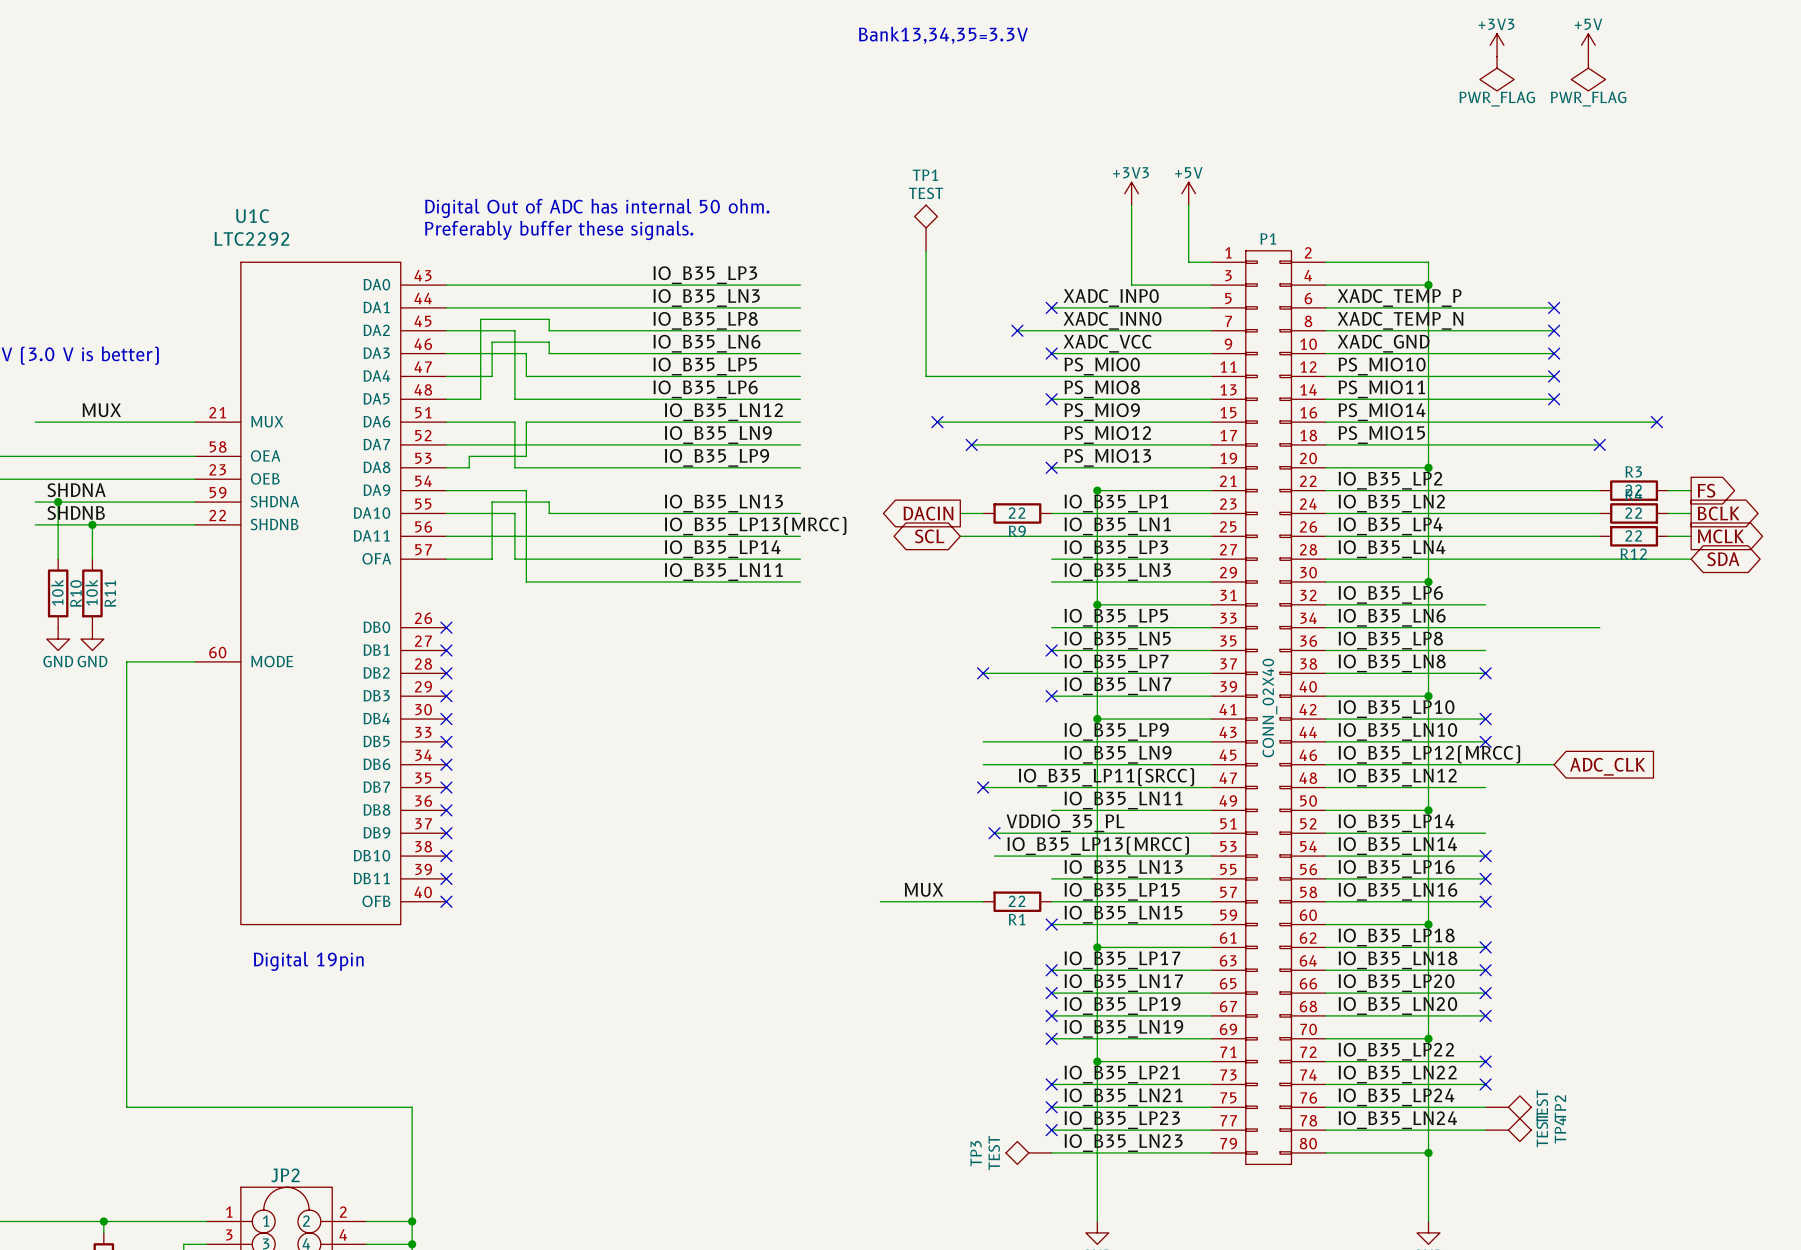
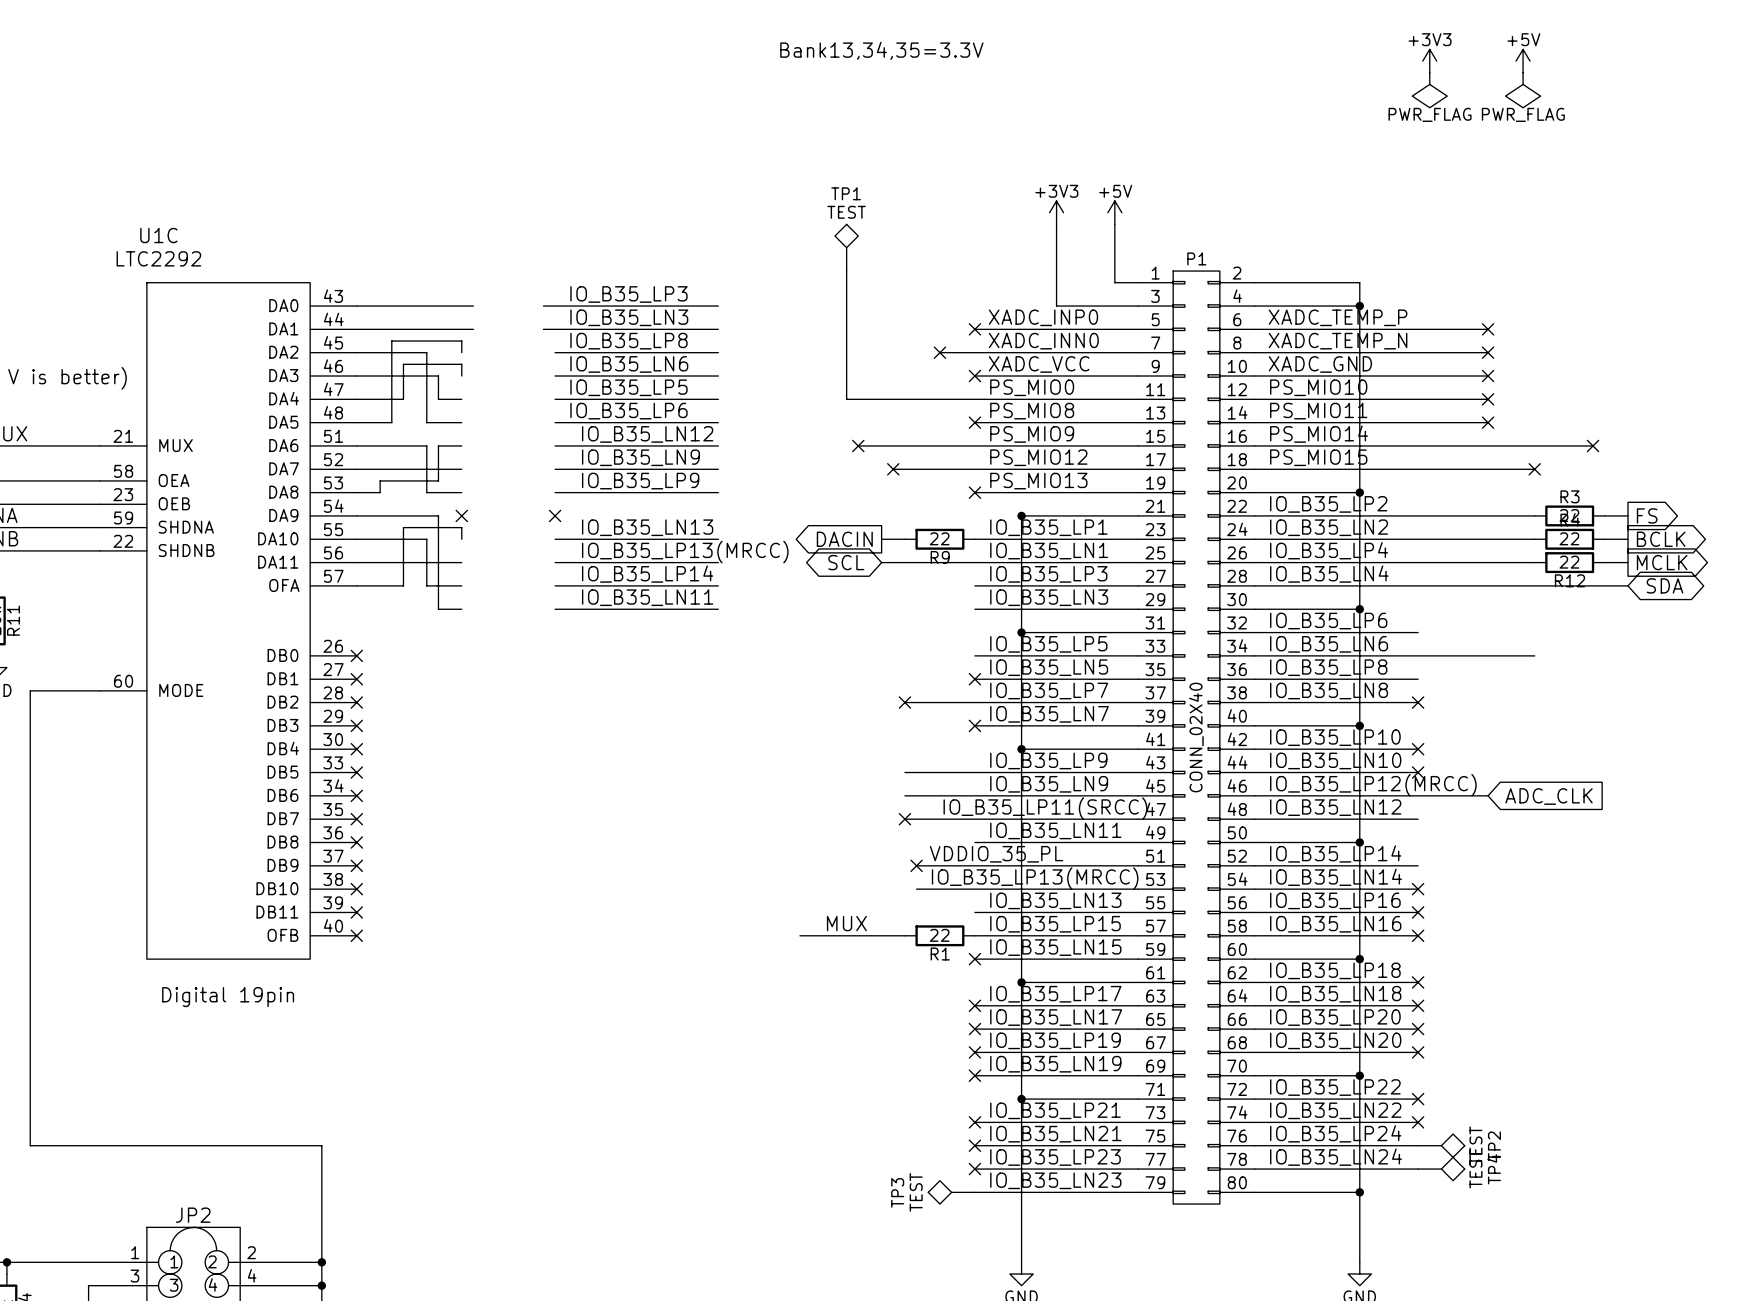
text: Digital Out of ADC has internal 50 ohm. (597, 208) -> none
text: Preferably buffer these signals. (559, 230) -> none
wire: (560, 285) (629, 285) -> none
wire: (560, 307) (629, 307) -> none
wire: (549, 330) (640, 330) -> none
wire: (549, 353) (640, 353) -> none
wire: (549, 376) (640, 376) -> none
wire: (549, 399) (640, 399) -> none
wire: (549, 422) (640, 422) -> none
wire: (549, 444) (640, 444) -> none
wire: (549, 467) (640, 467) -> none
no-connect mark: none -> (461, 515)
no-connect mark: none -> (555, 515)
wire: (549, 513) (640, 513) -> none
wire: (549, 536) (640, 536) -> none
wire: (549, 559) (640, 559) -> none
wire: (549, 581) (640, 581) -> none

